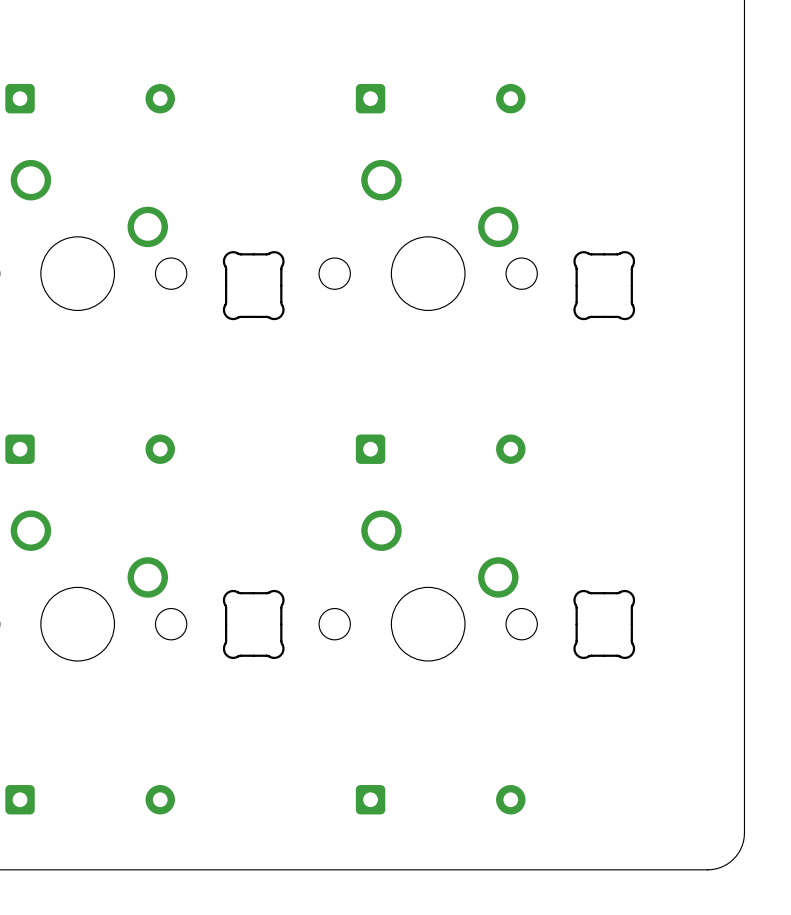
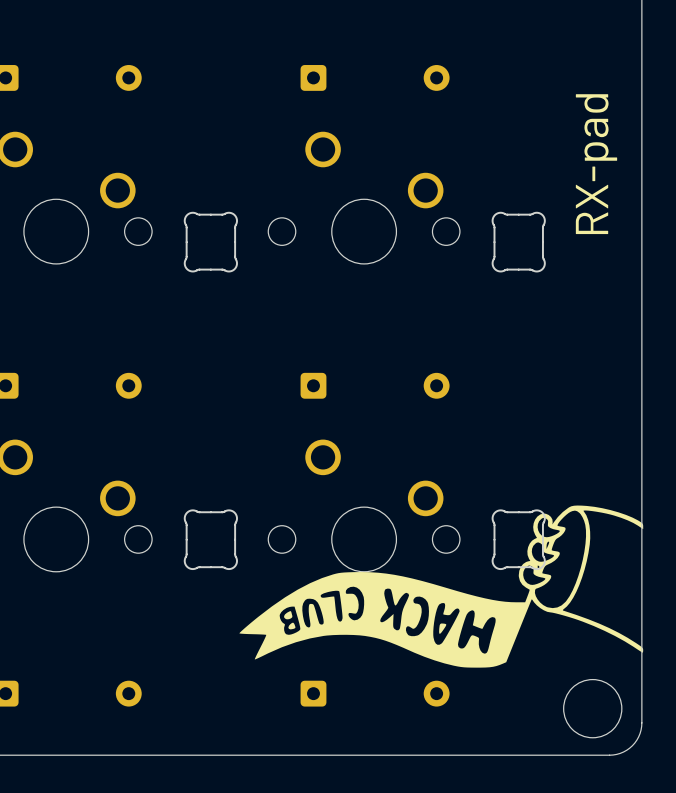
text: none -> RX-pad (596, 164)
drawing: none -> [239, 505, 644, 668]
round board edge: none -> [563, 679, 623, 739]

